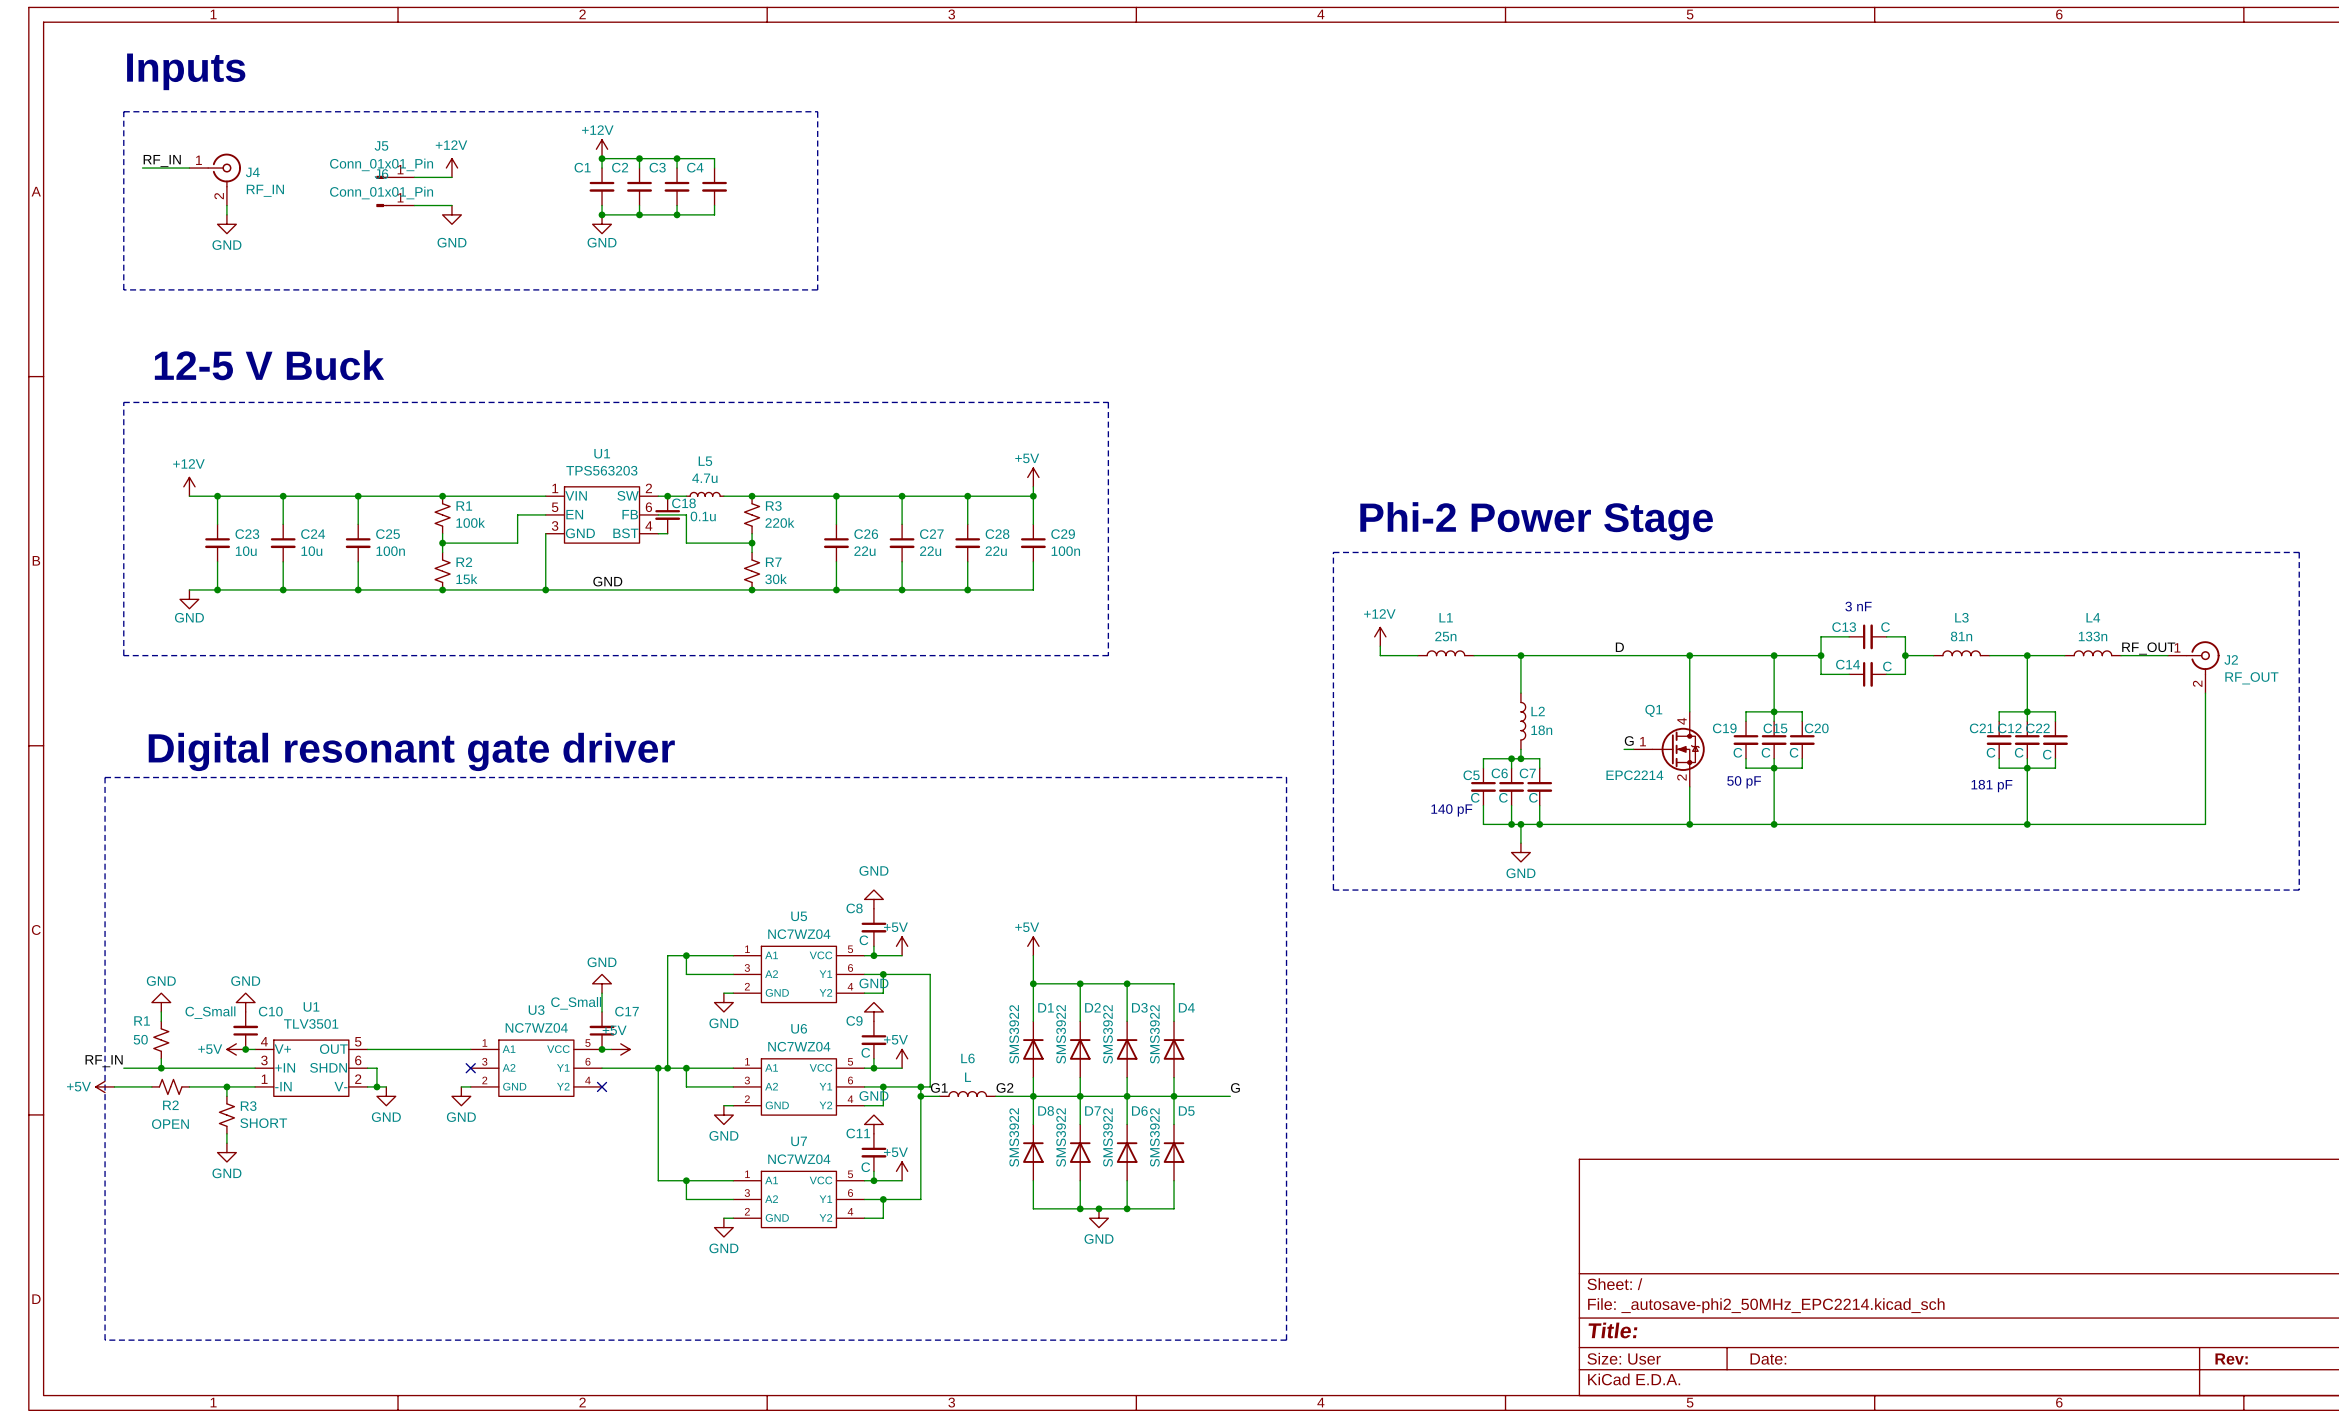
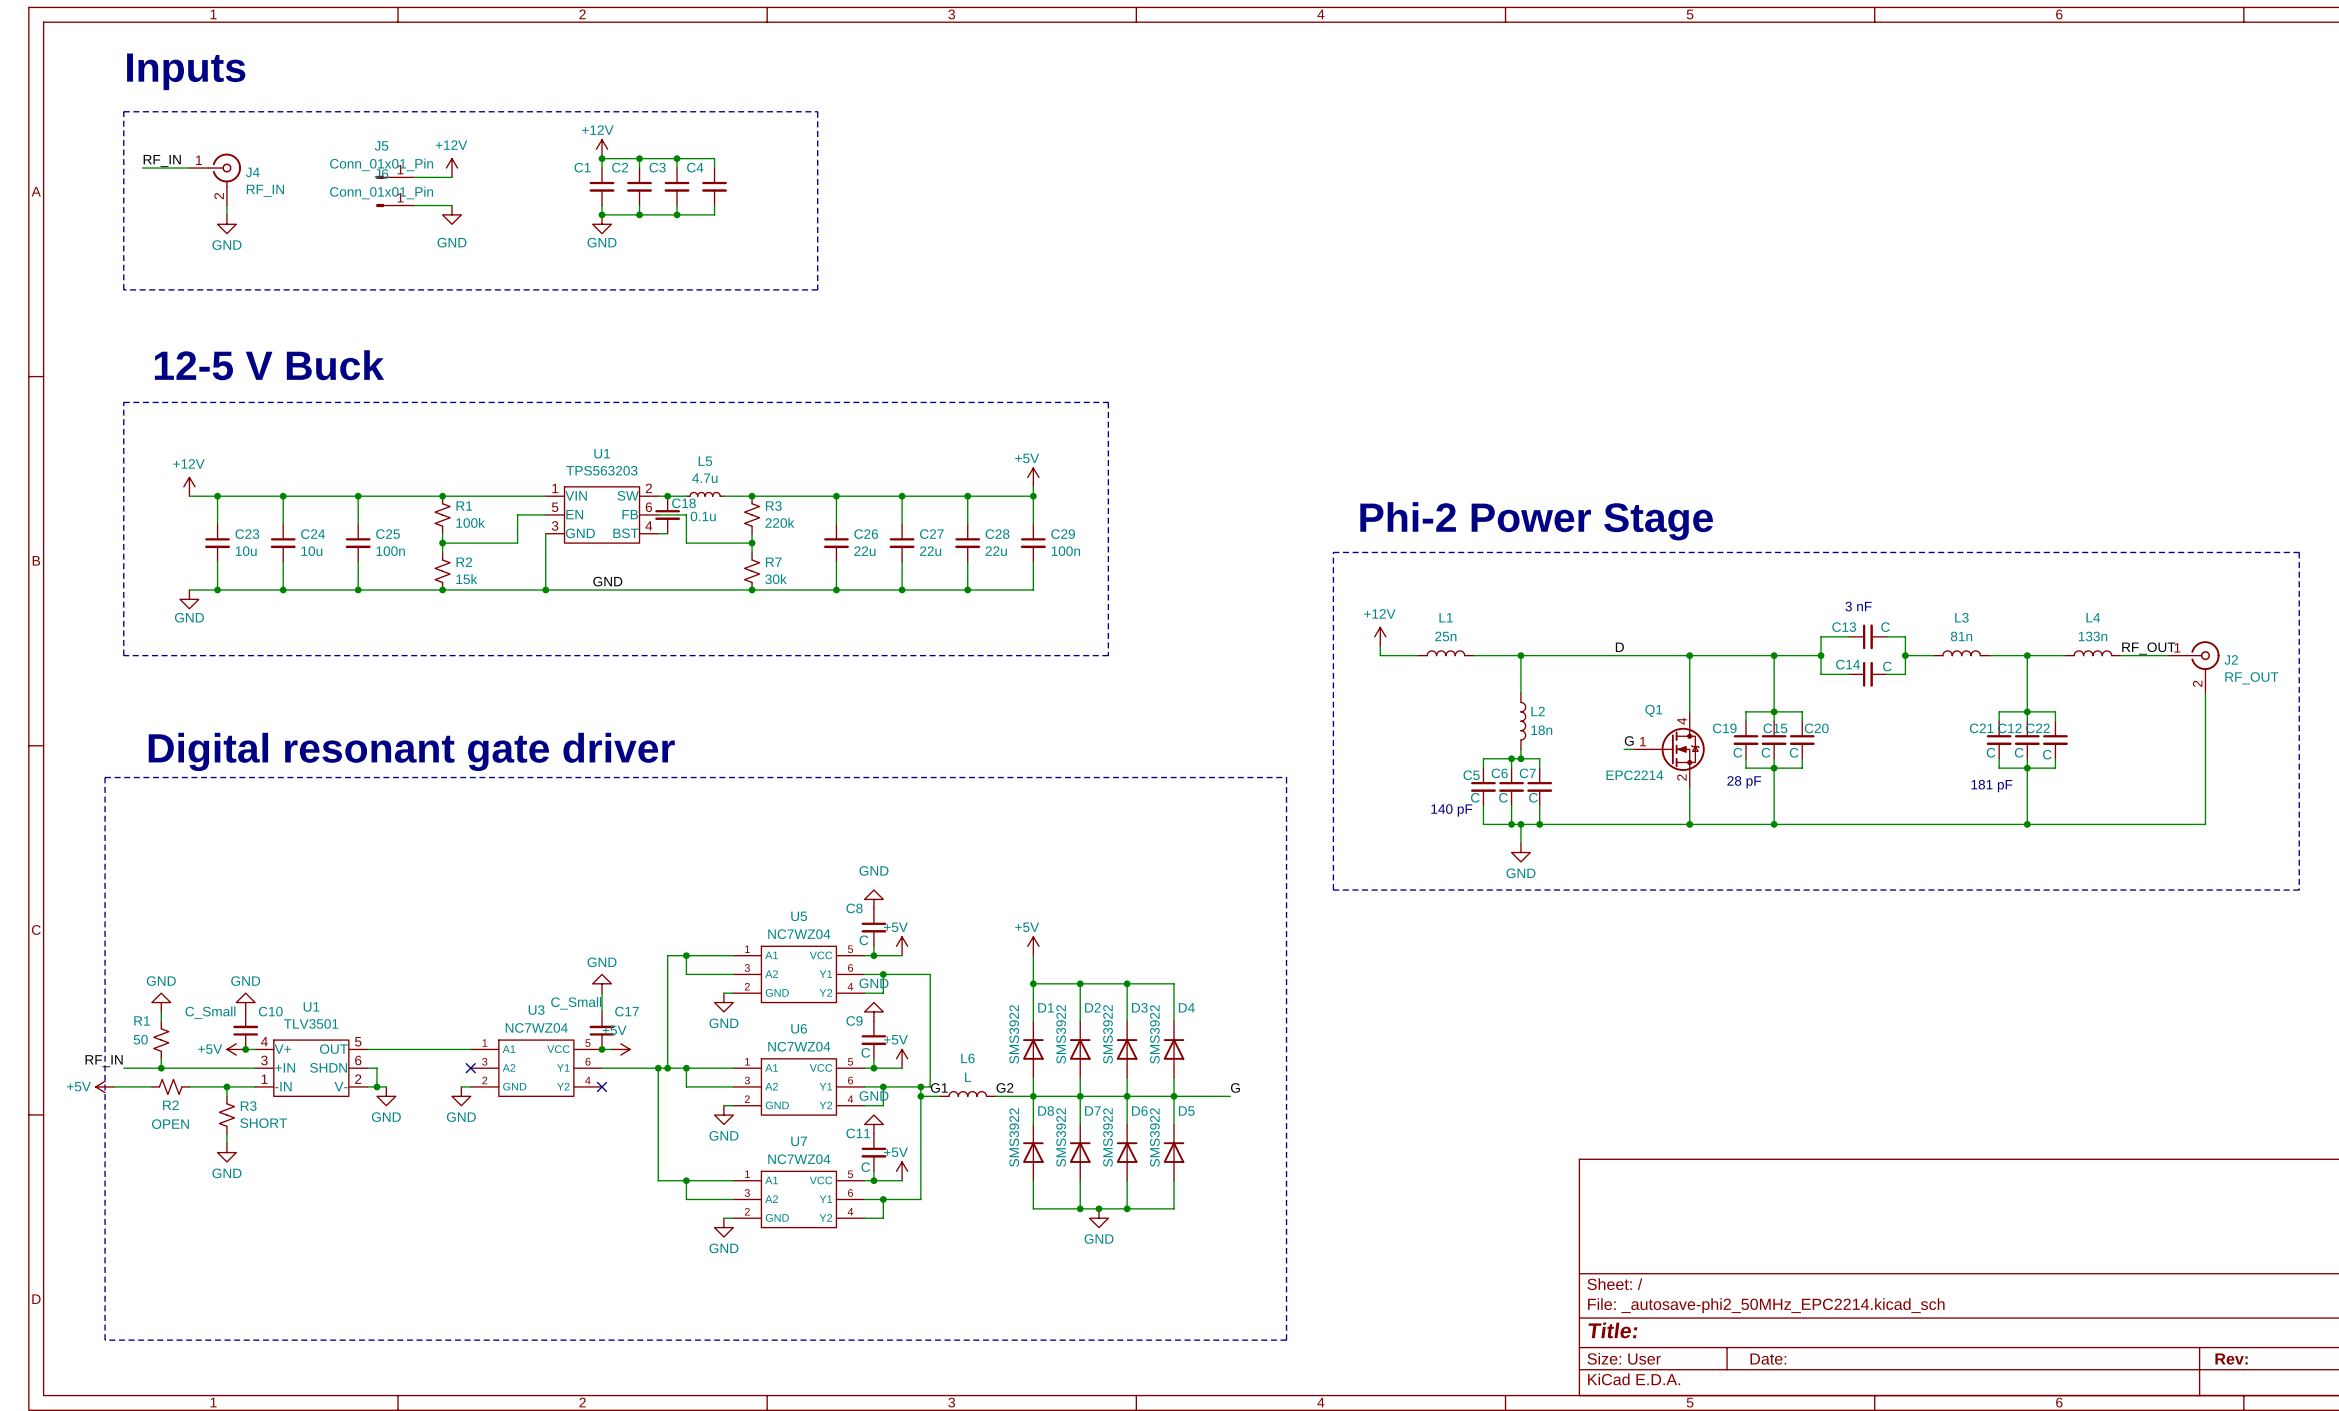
text: 50 pF (1744, 782) -> 28 pF (1744, 782)

